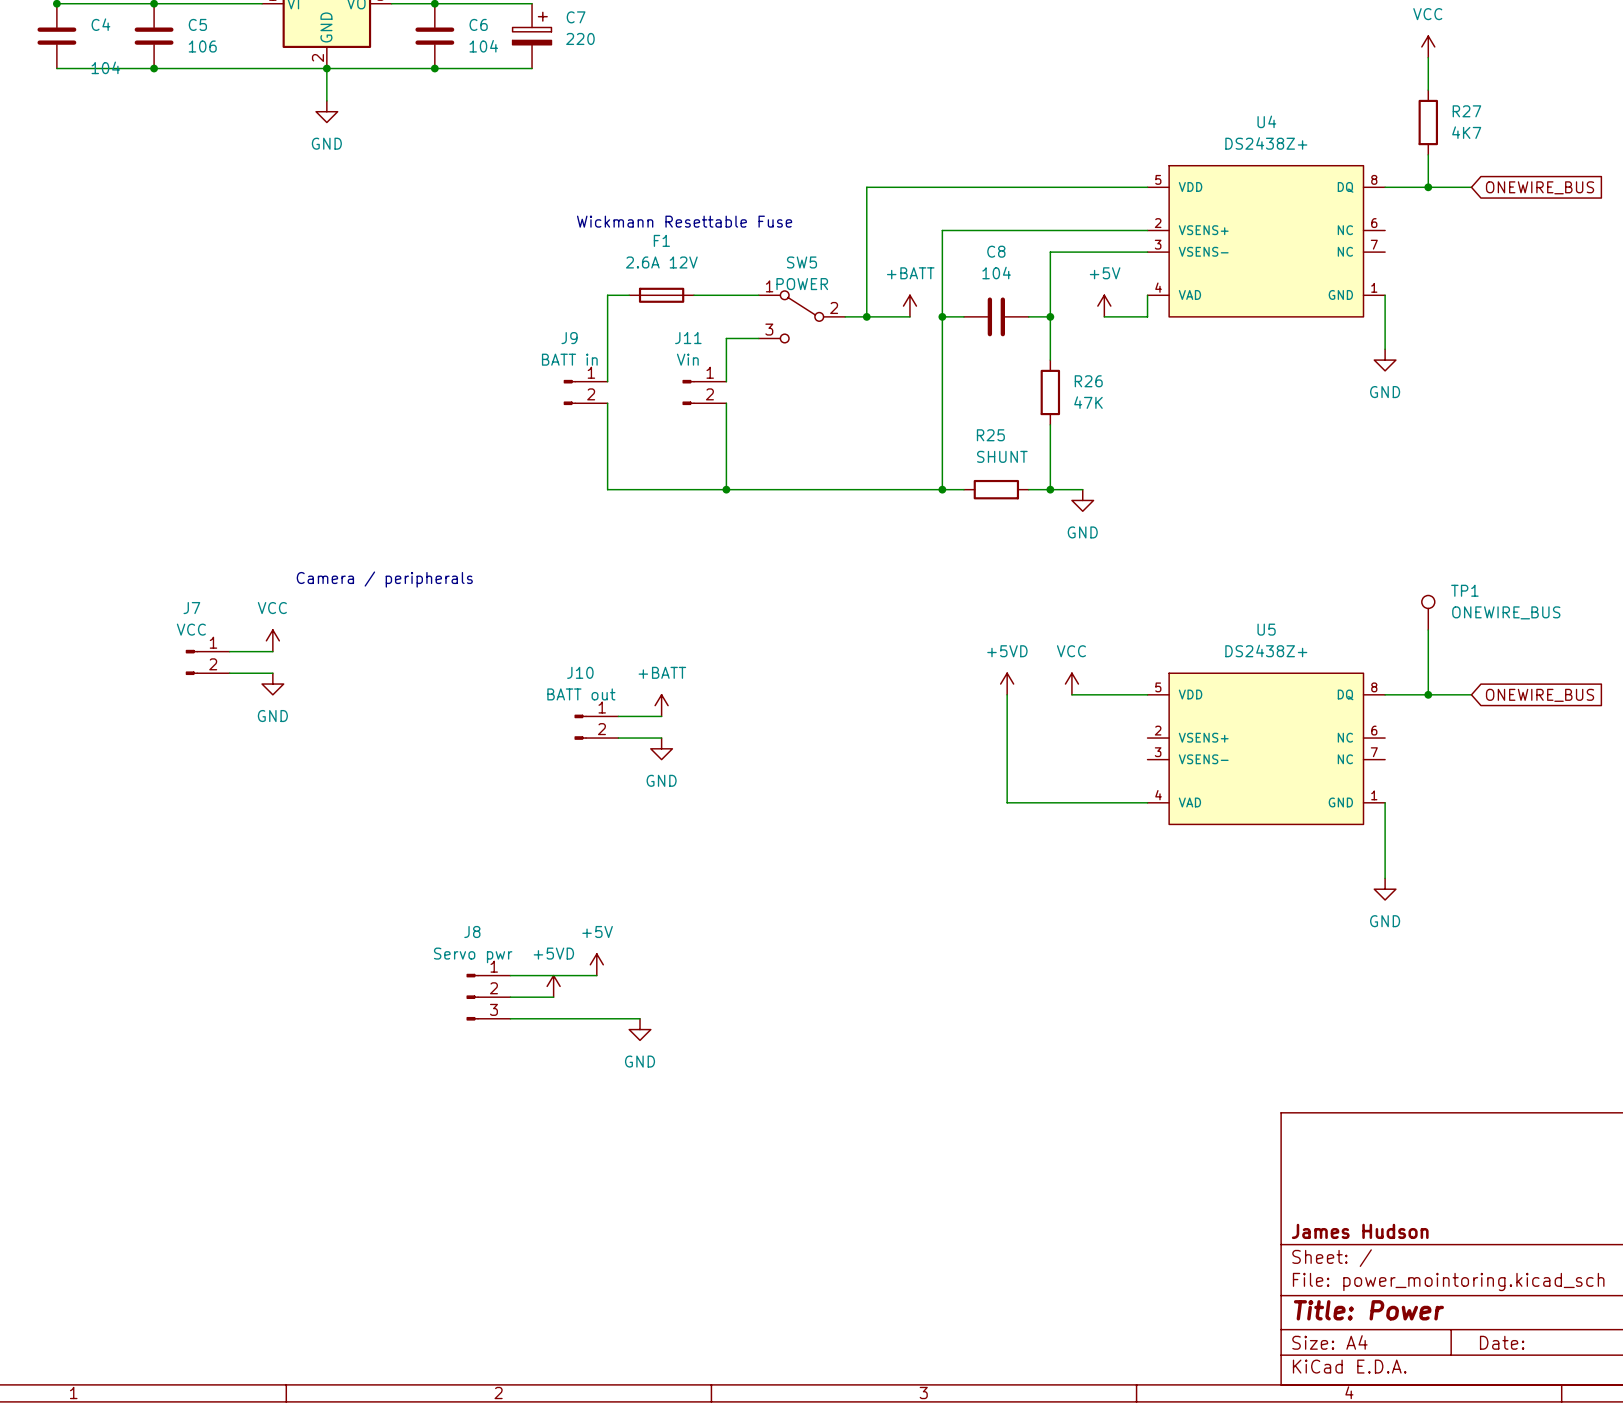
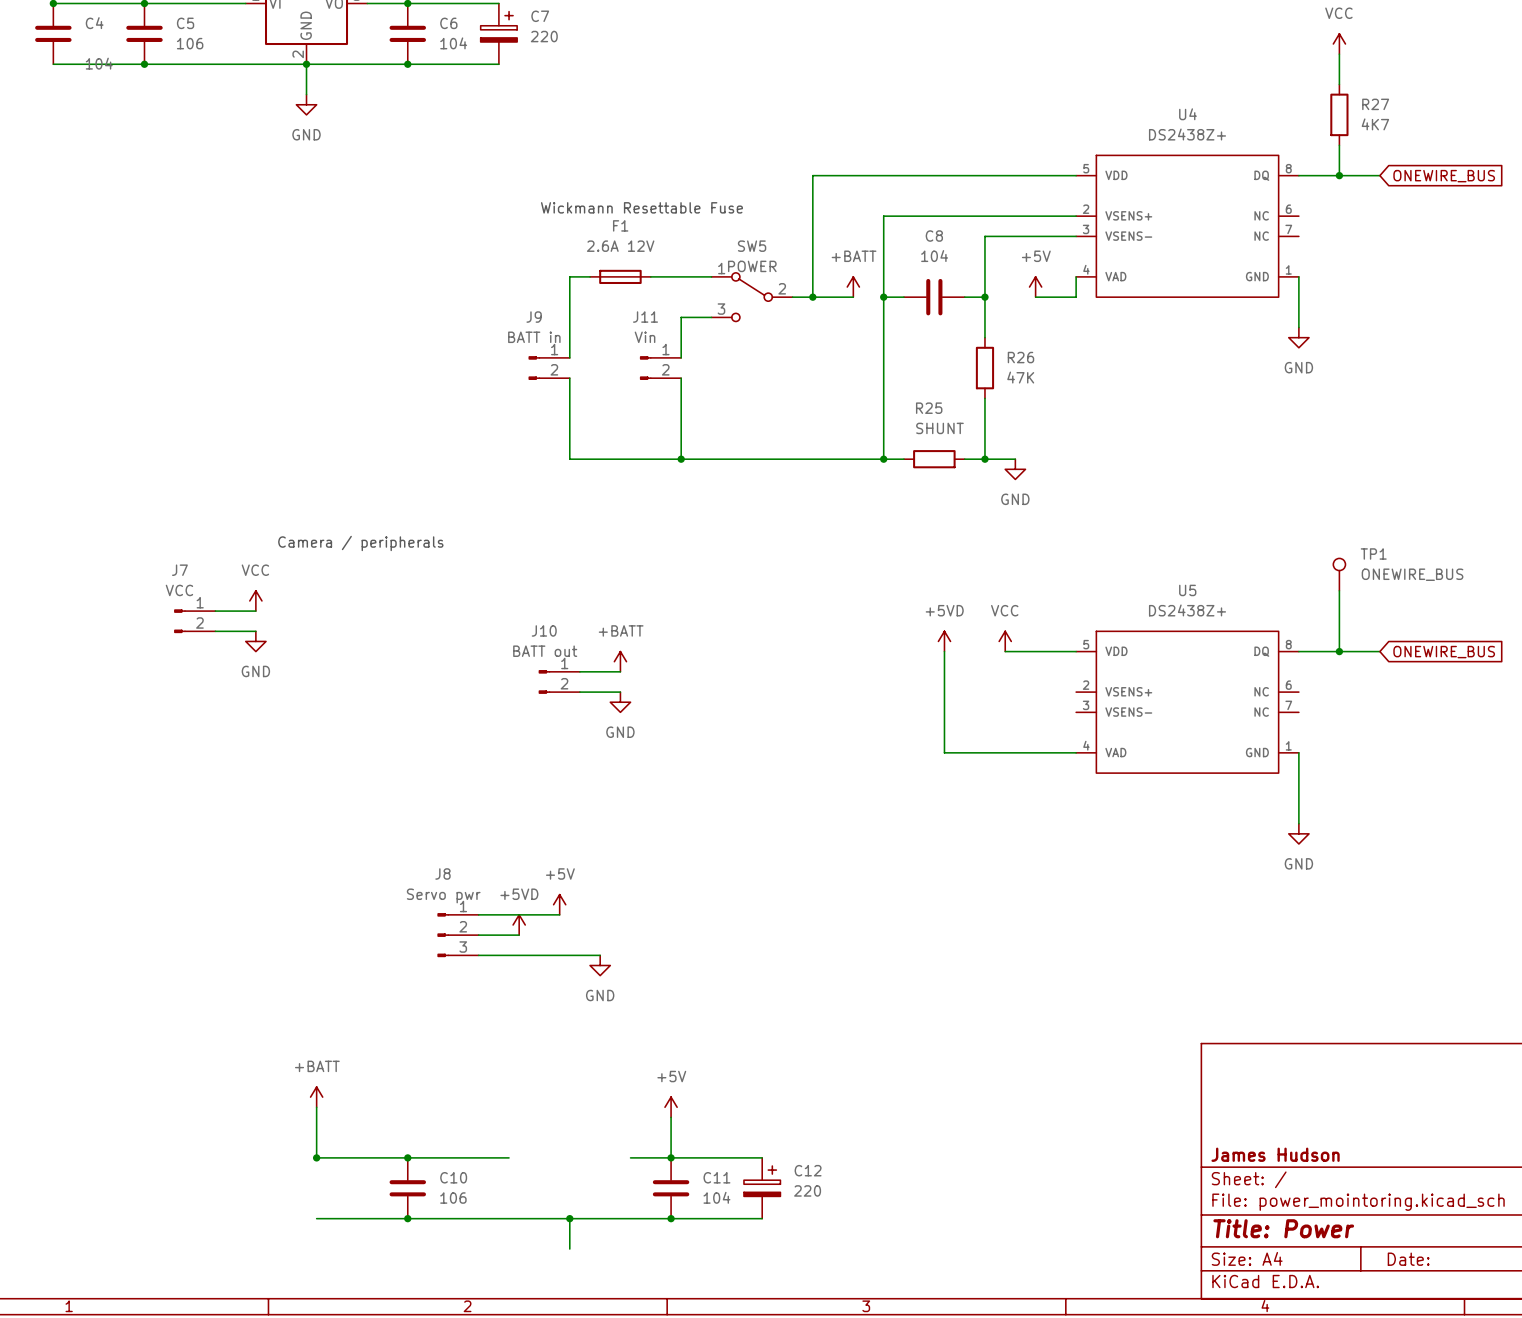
power symbol: none -> +BATT (316, 1097)
wire: none -> (316, 1107) (316, 1157) (509, 1157)
power symbol: none -> +5V (671, 1107)
wire: none -> (671, 1117) (671, 1157)
junction: none -> (316, 1157)
junction: none -> (407, 1157)
wire: none -> (630, 1157) (762, 1157)
junction: none -> (671, 1157)
C10: none -> 106 (407, 1188)
C11: none -> 104 (671, 1188)
C12: none -> 220 (762, 1188)
wire: none -> (316, 1218) (762, 1218)
junction: none -> (407, 1218)
wire: none -> (569, 1218) (569, 1249)
junction: none -> (569, 1218)
junction: none -> (671, 1218)

